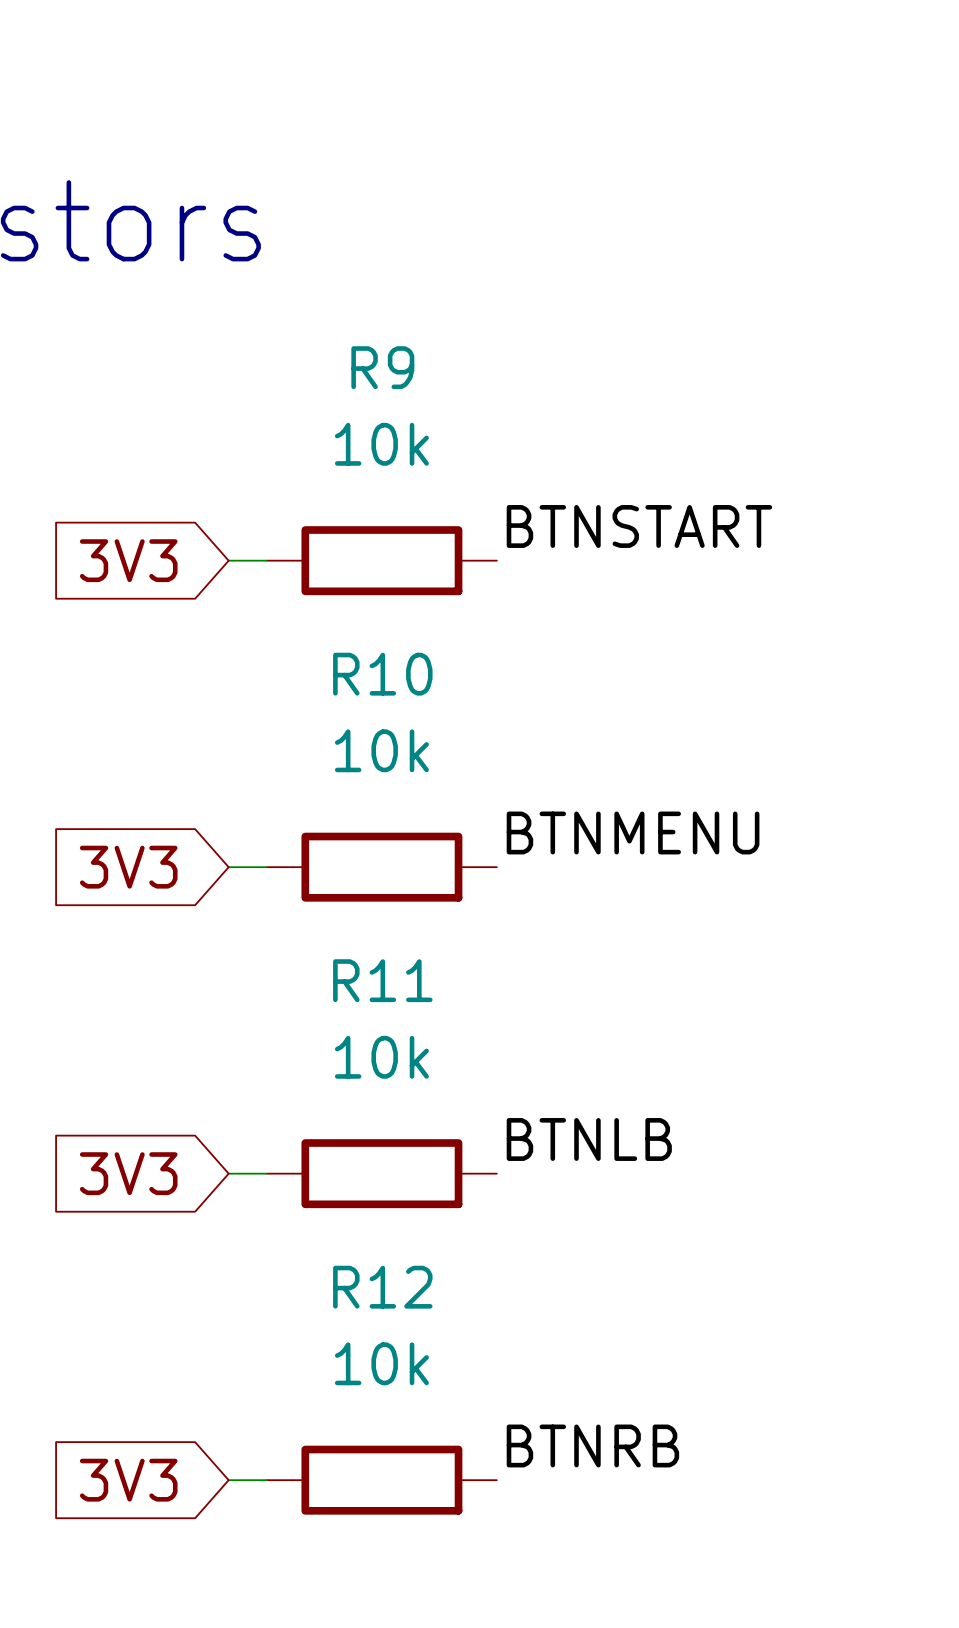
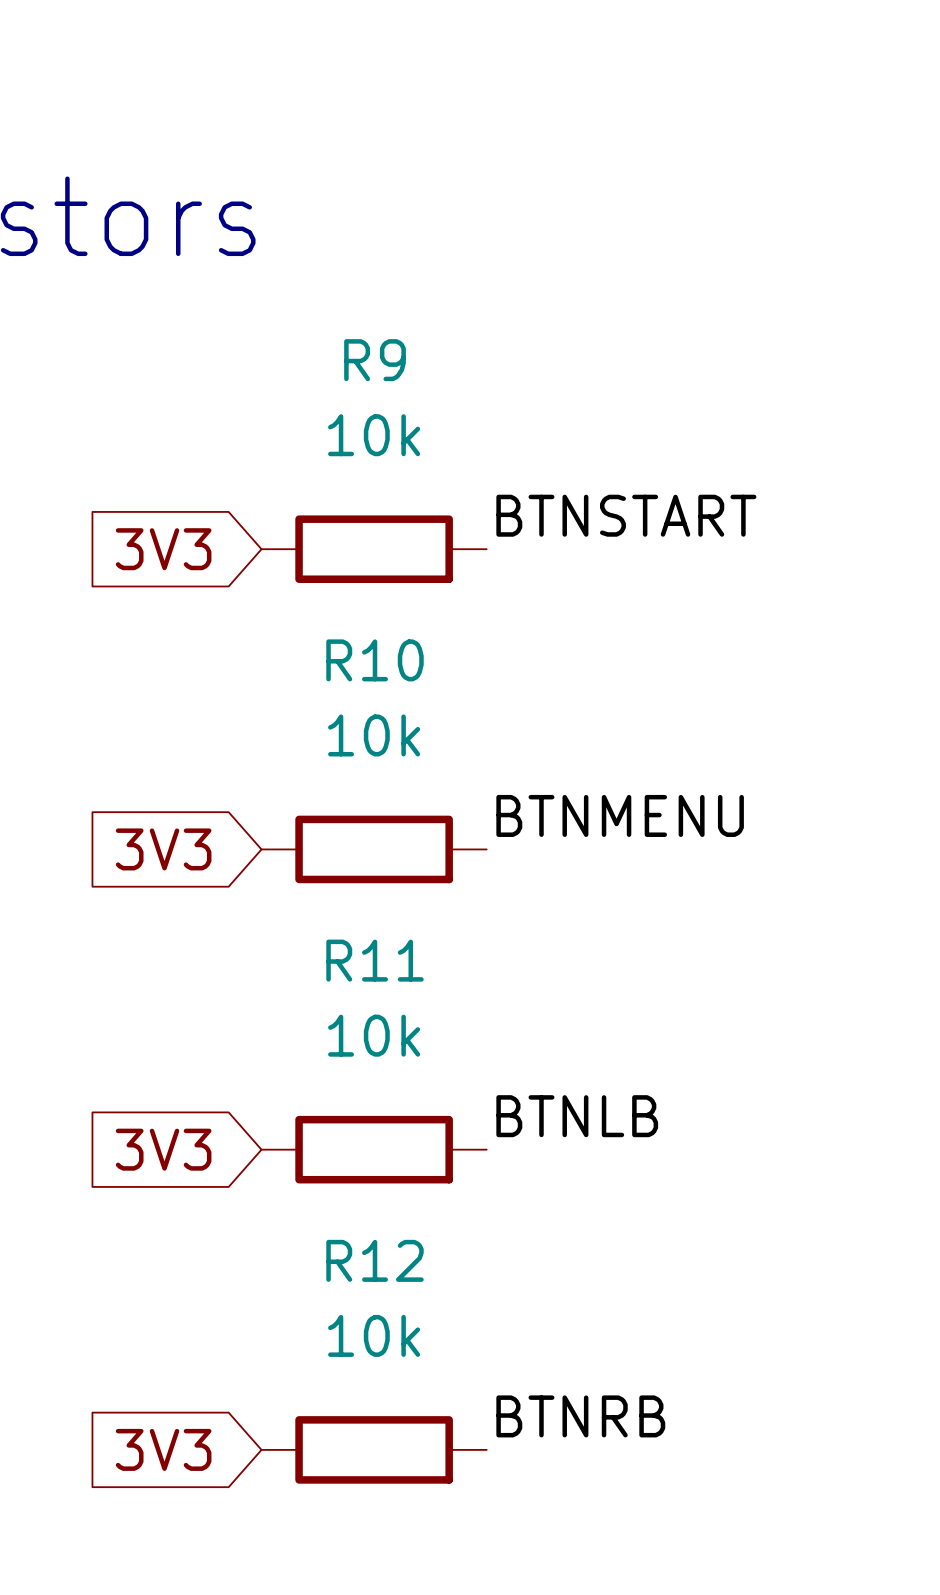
global label position: 3V3 (128, 560) -> 3V3 (163, 549)
wire: (228, 560) (266, 560) -> none
global label position: 3V3 (128, 867) -> 3V3 (163, 849)
wire: (228, 867) (266, 867) -> none
global label position: 3V3 (128, 1173) -> 3V3 (163, 1149)
wire: (228, 1173) (266, 1173) -> none
global label position: 3V3 (128, 1480) -> 3V3 (163, 1449)
wire: (228, 1480) (266, 1480) -> none

